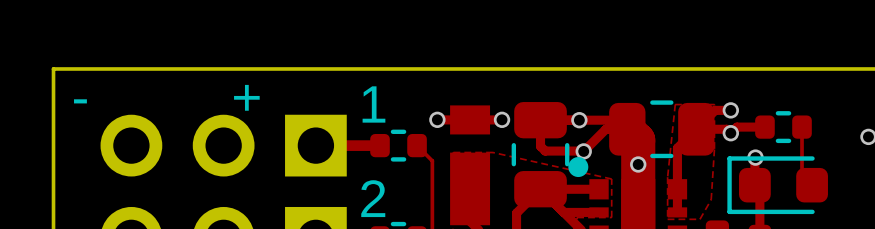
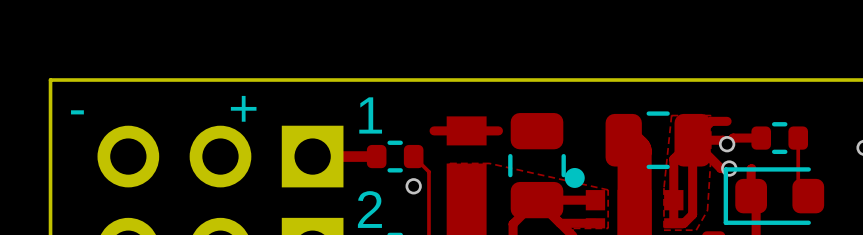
via: (730, 110) -> none
via: (437, 119) -> none
via: (502, 119) -> none
via: (579, 120) -> none
track: (583, 151) (545, 151) (540, 146) (540, 120) (618, 120) (627, 129) (605, 129) (583, 151) -> none
via: (583, 151) -> none
track: none -> (729, 168) (720, 168) (692, 140) (692, 214) (683, 223) (673, 223)
via position: (755, 157) -> (729, 168)
via: (638, 164) -> none
via: none -> (413, 186)

